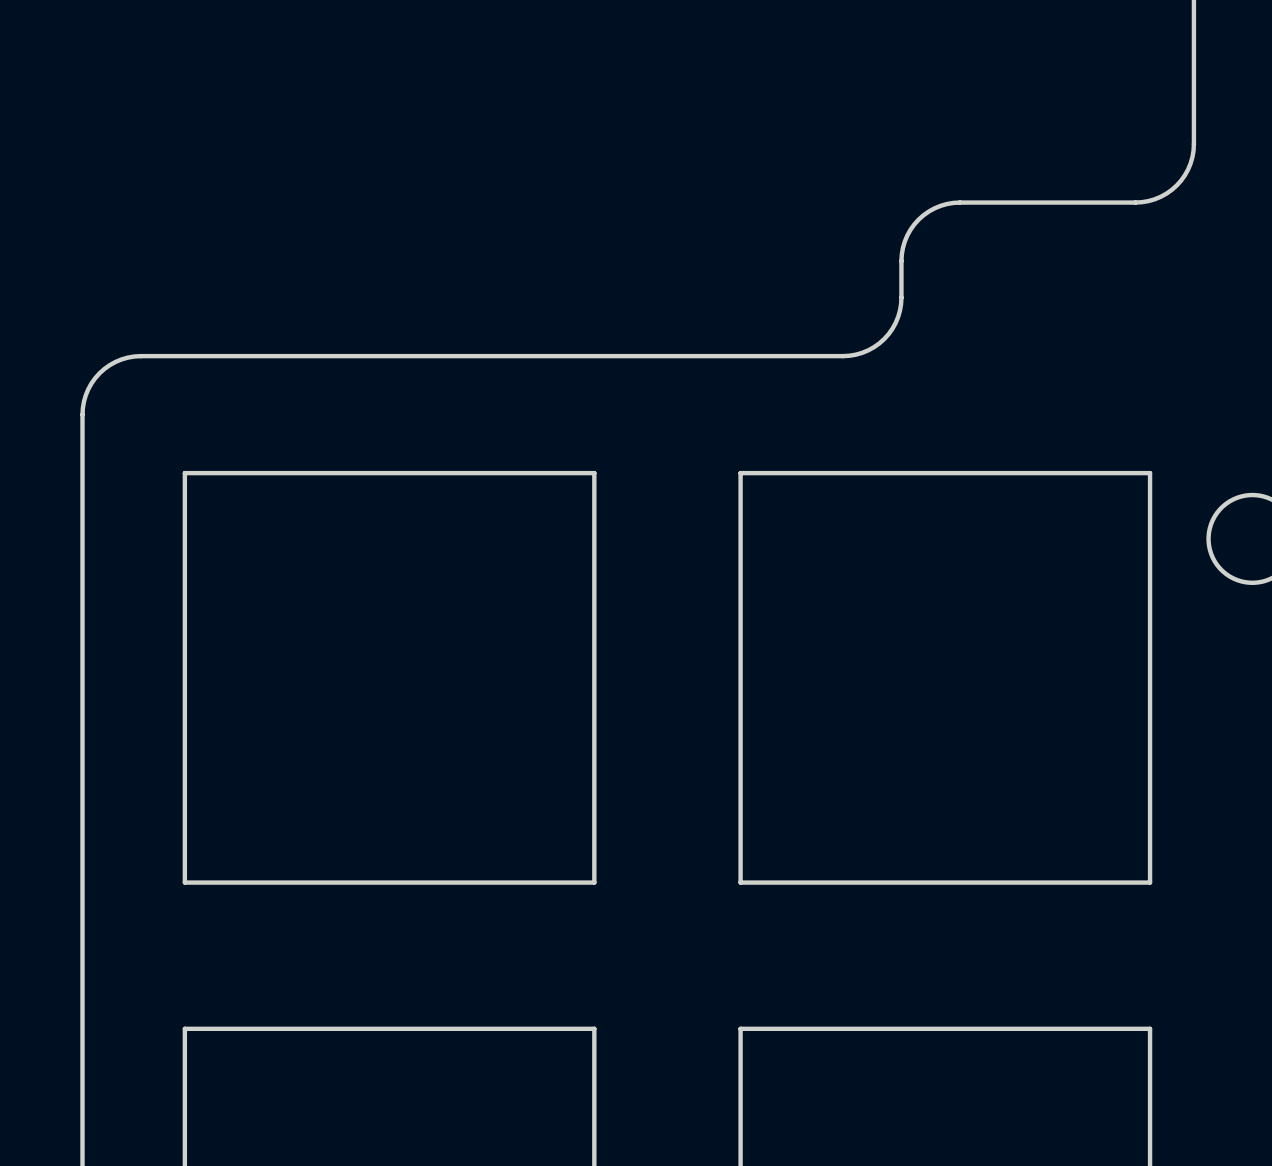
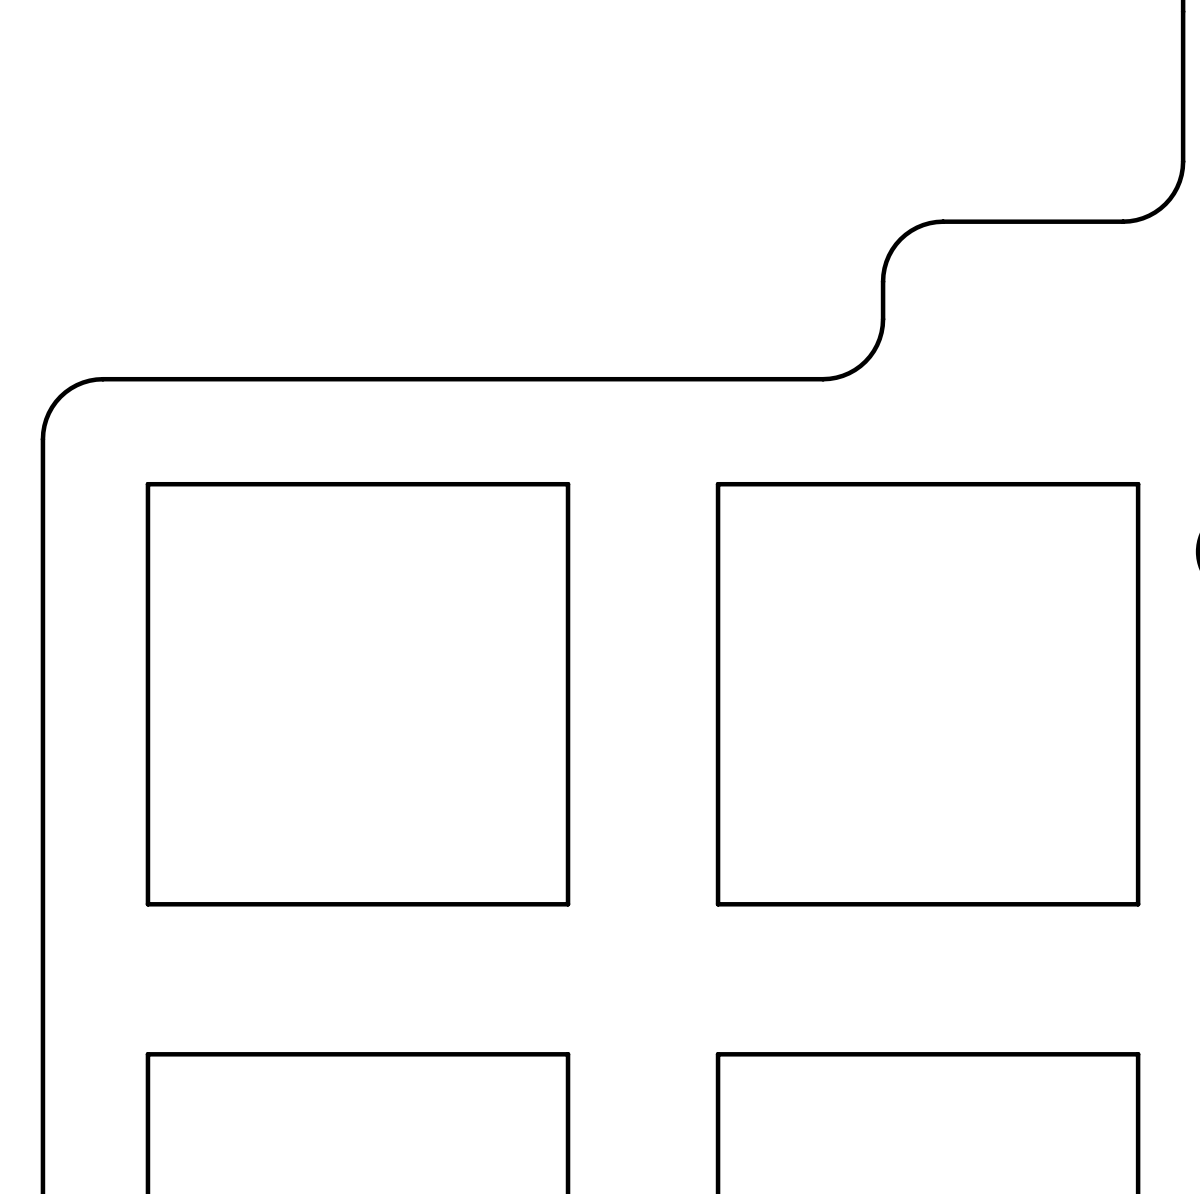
board edge: (1193, 144) (1190, 163) (1181, 180) (1166, 193) (1148, 201) (959, 202) (934, 208) (918, 219) (907, 235) (901, 254) (901, 275) -> (1183, 146) (1182, 168) (1177, 187) (1165, 204) (1149, 215) (1136, 220) (1123, 221) (929, 223) (911, 230) (896, 244) (886, 261) (883, 281)
board edge: (901, 297) (895, 323) (884, 338) (868, 350) (849, 355) (134, 356) (109, 365) (95, 378) (83, 401) (82, 429) -> (883, 304) (881, 332) (877, 345) (869, 356) (860, 366) (849, 373) (829, 378) (96, 379) (83, 382) (71, 388) (56, 401) (46, 419) (42, 439)

